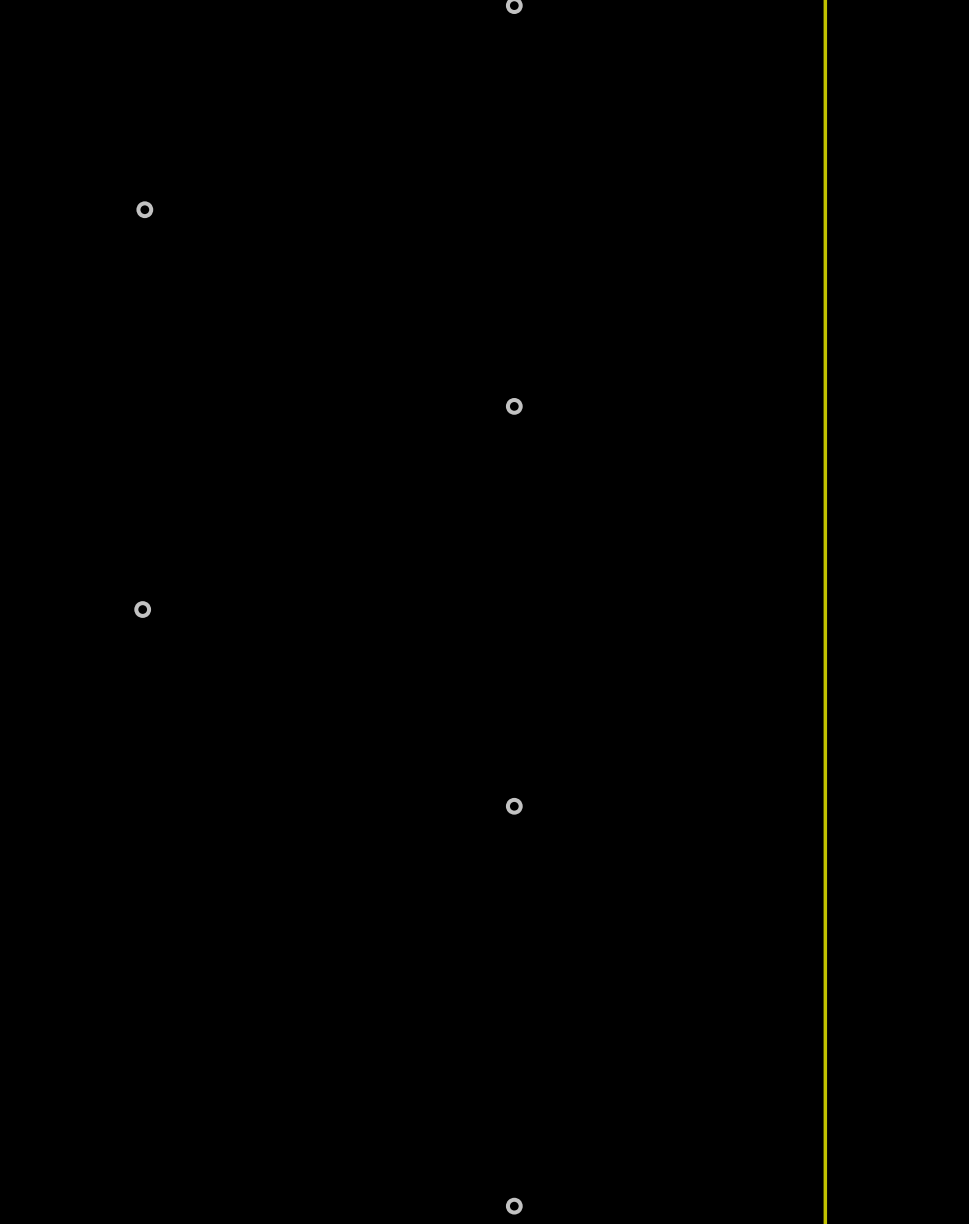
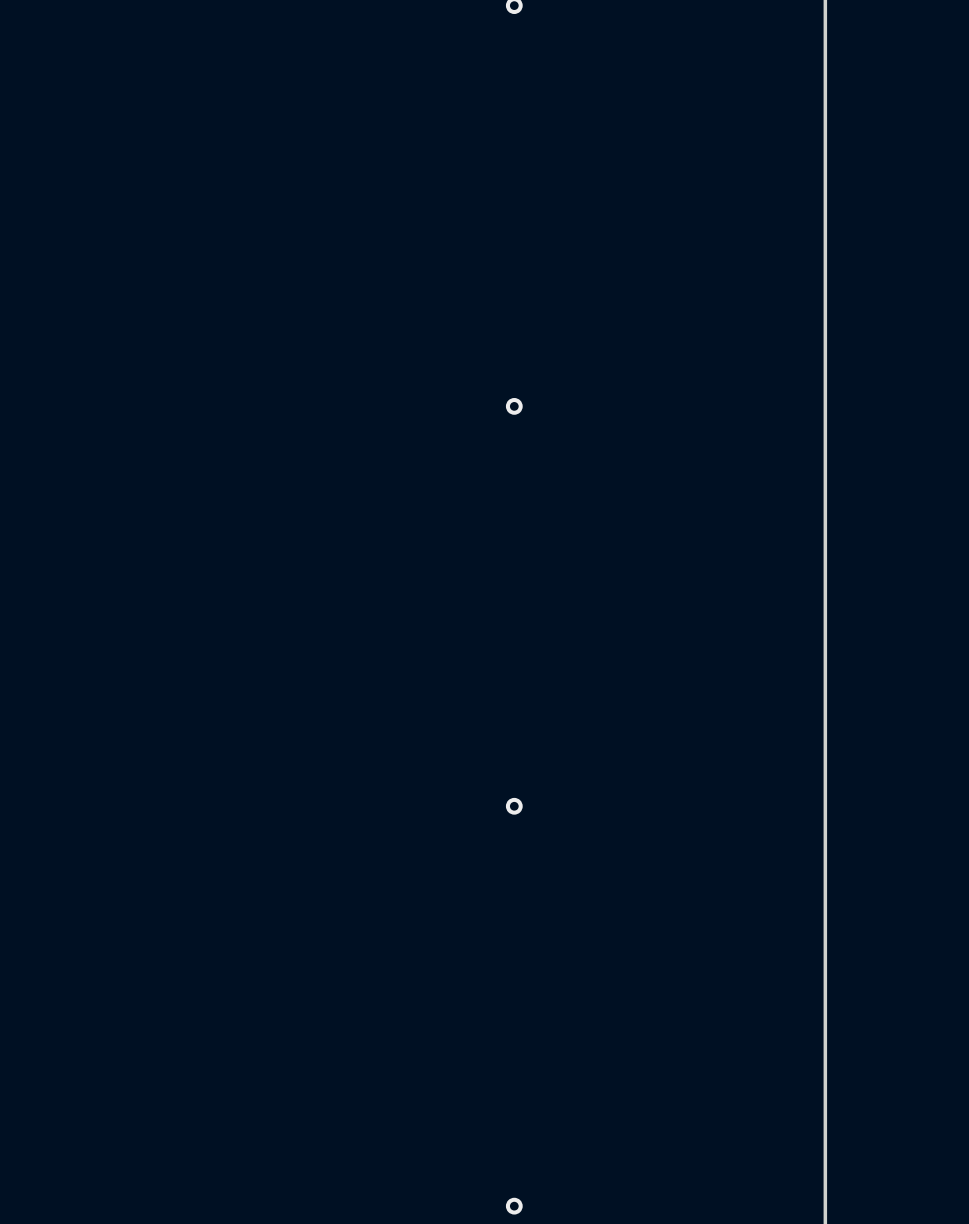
via: (144, 209) -> none
via: (142, 609) -> none

